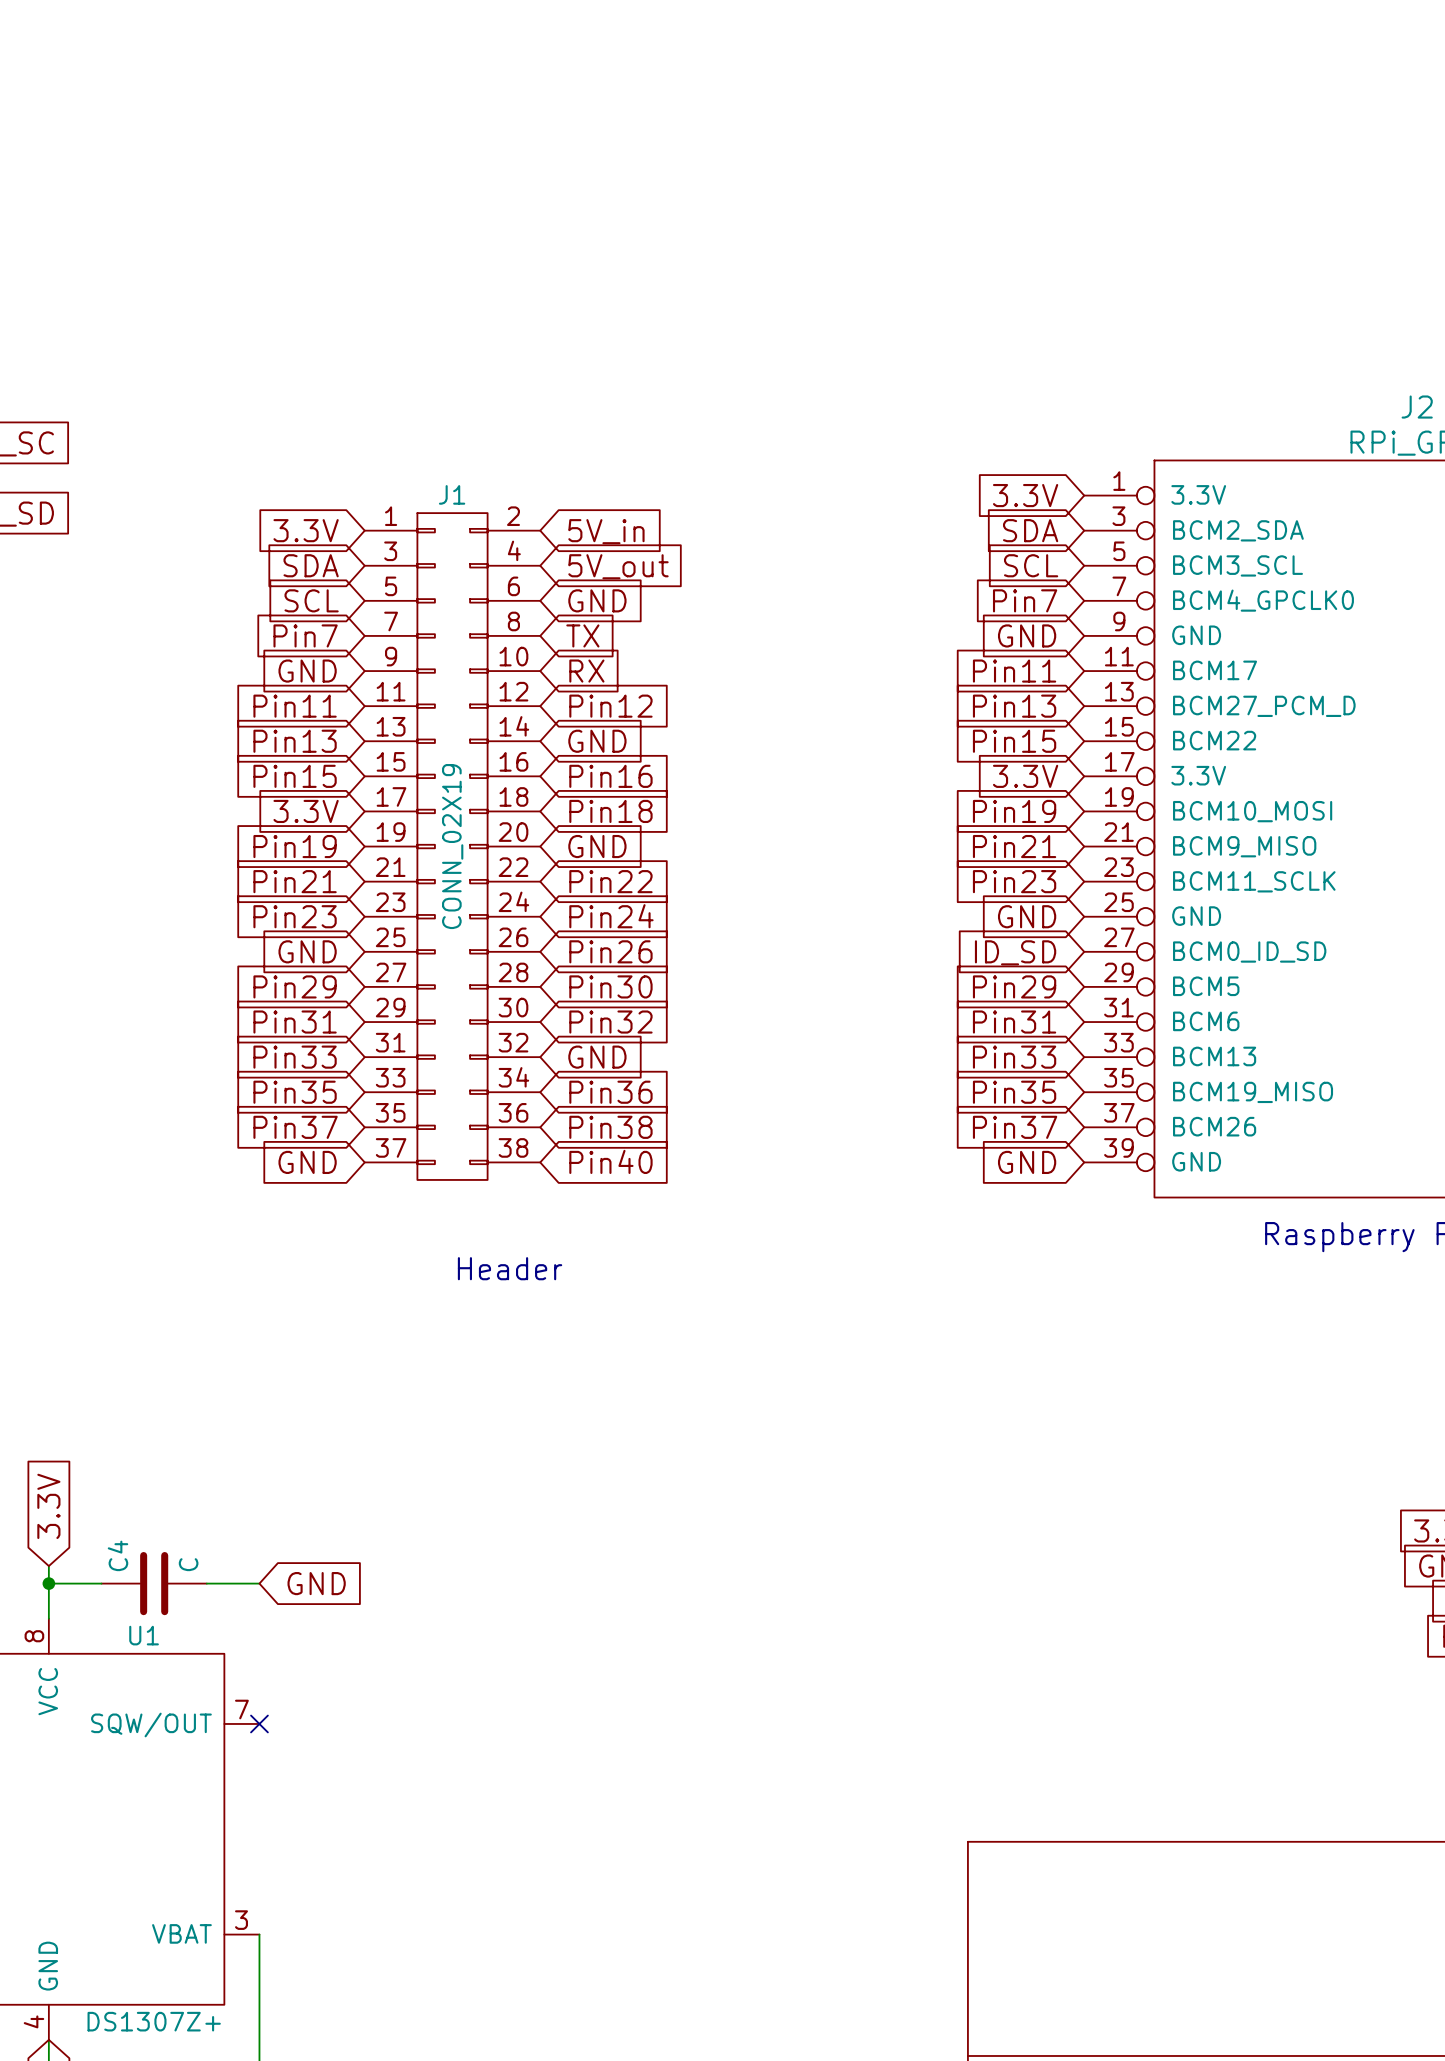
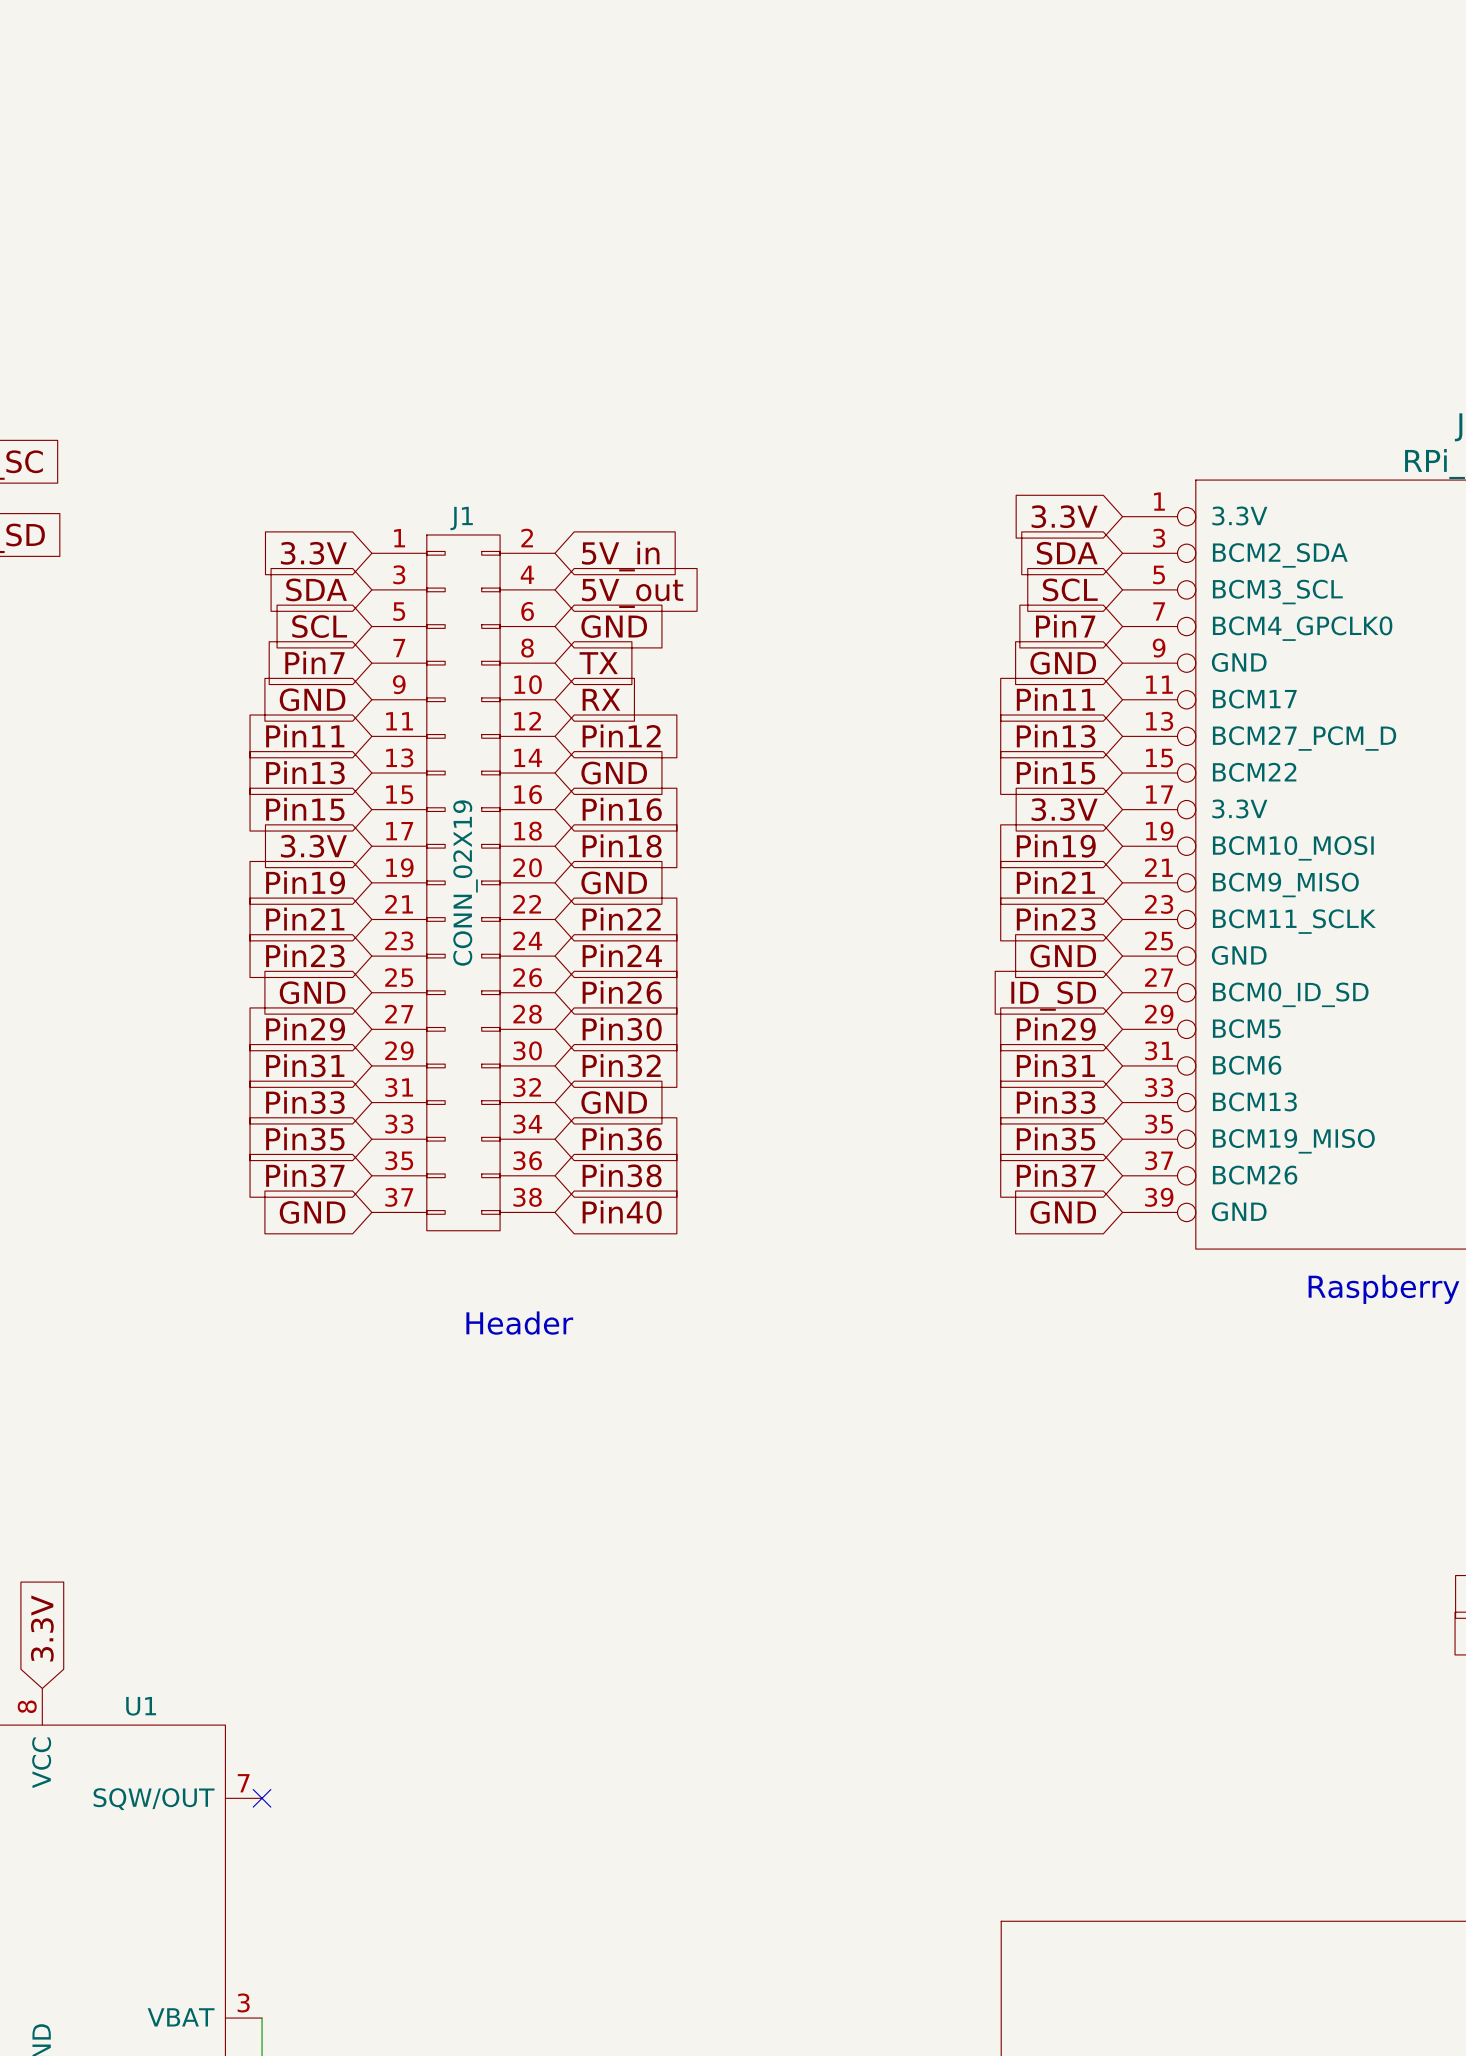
global label position: 3.3V (48, 1506) -> 3.3V (42, 1628)
wire: (48, 1566) (48, 1618) -> none
wire: (48, 1583) (101, 1583) -> none
junction: (48, 1583) -> none
C4: C (154, 1583) -> none
wire: (206, 1583) (259, 1583) -> none
global label: GND (316, 1583) -> none

